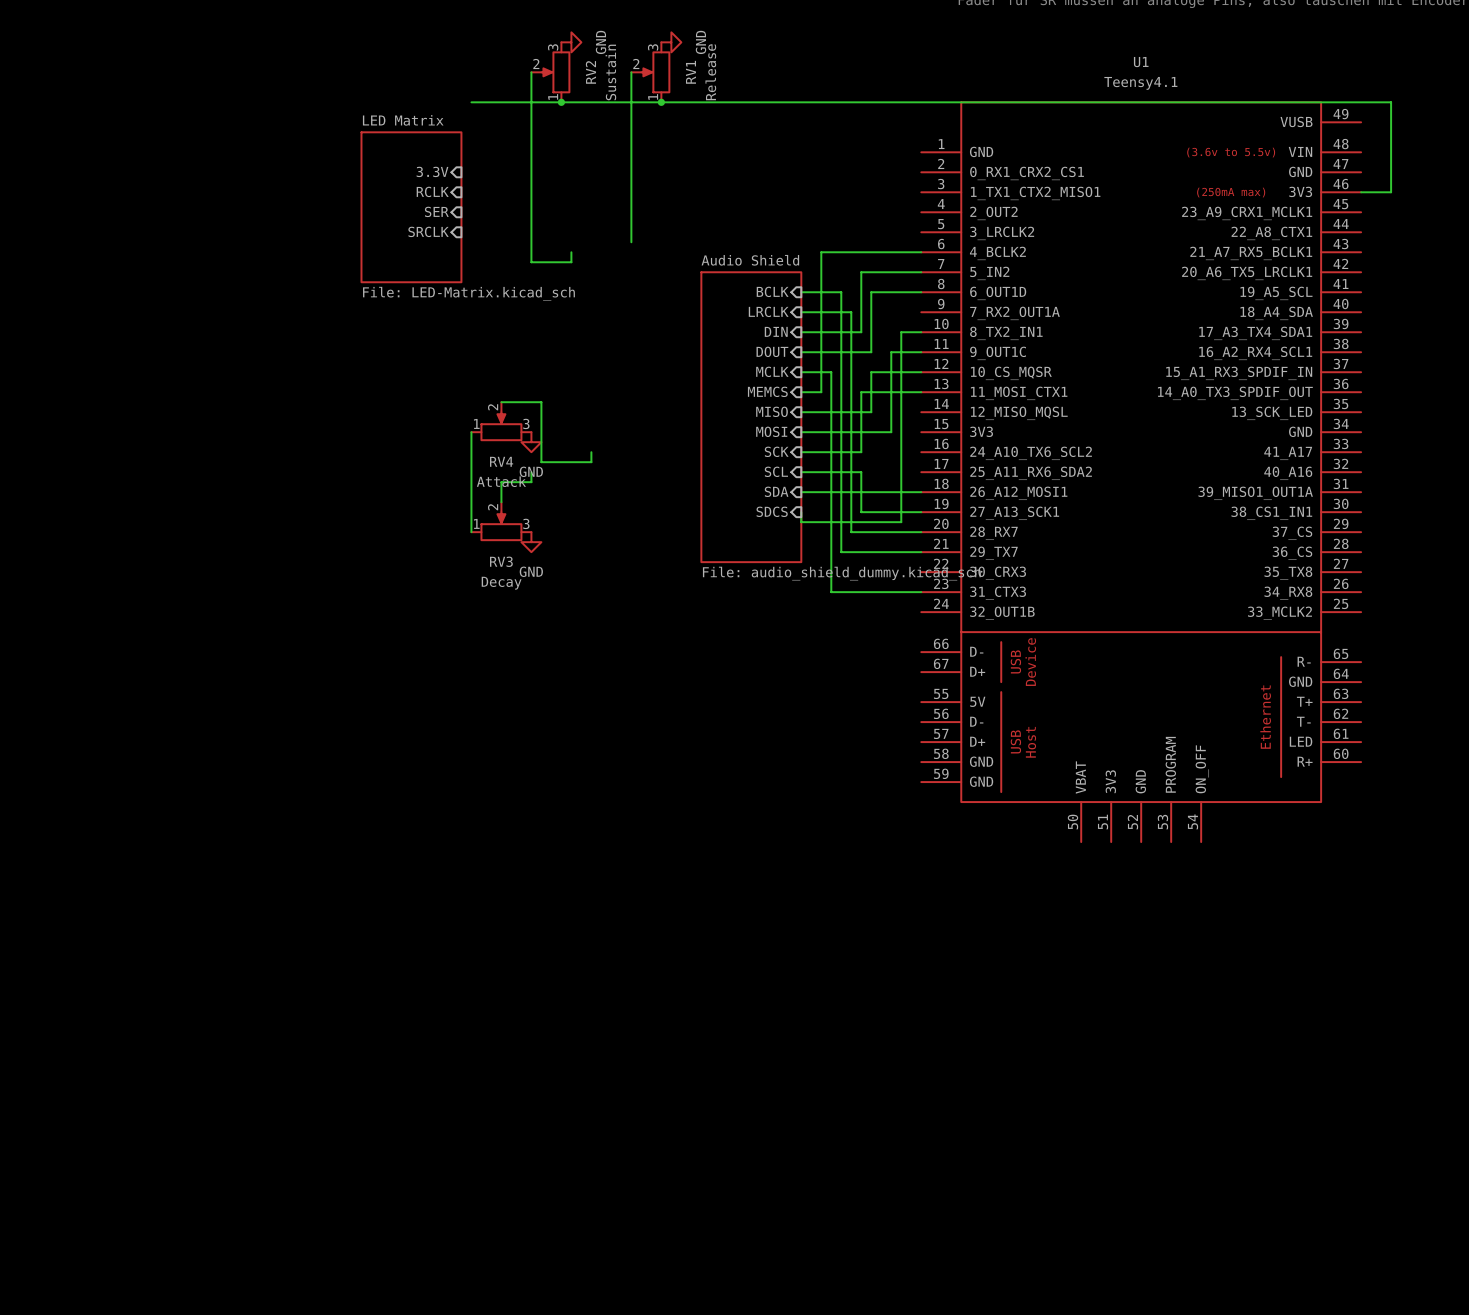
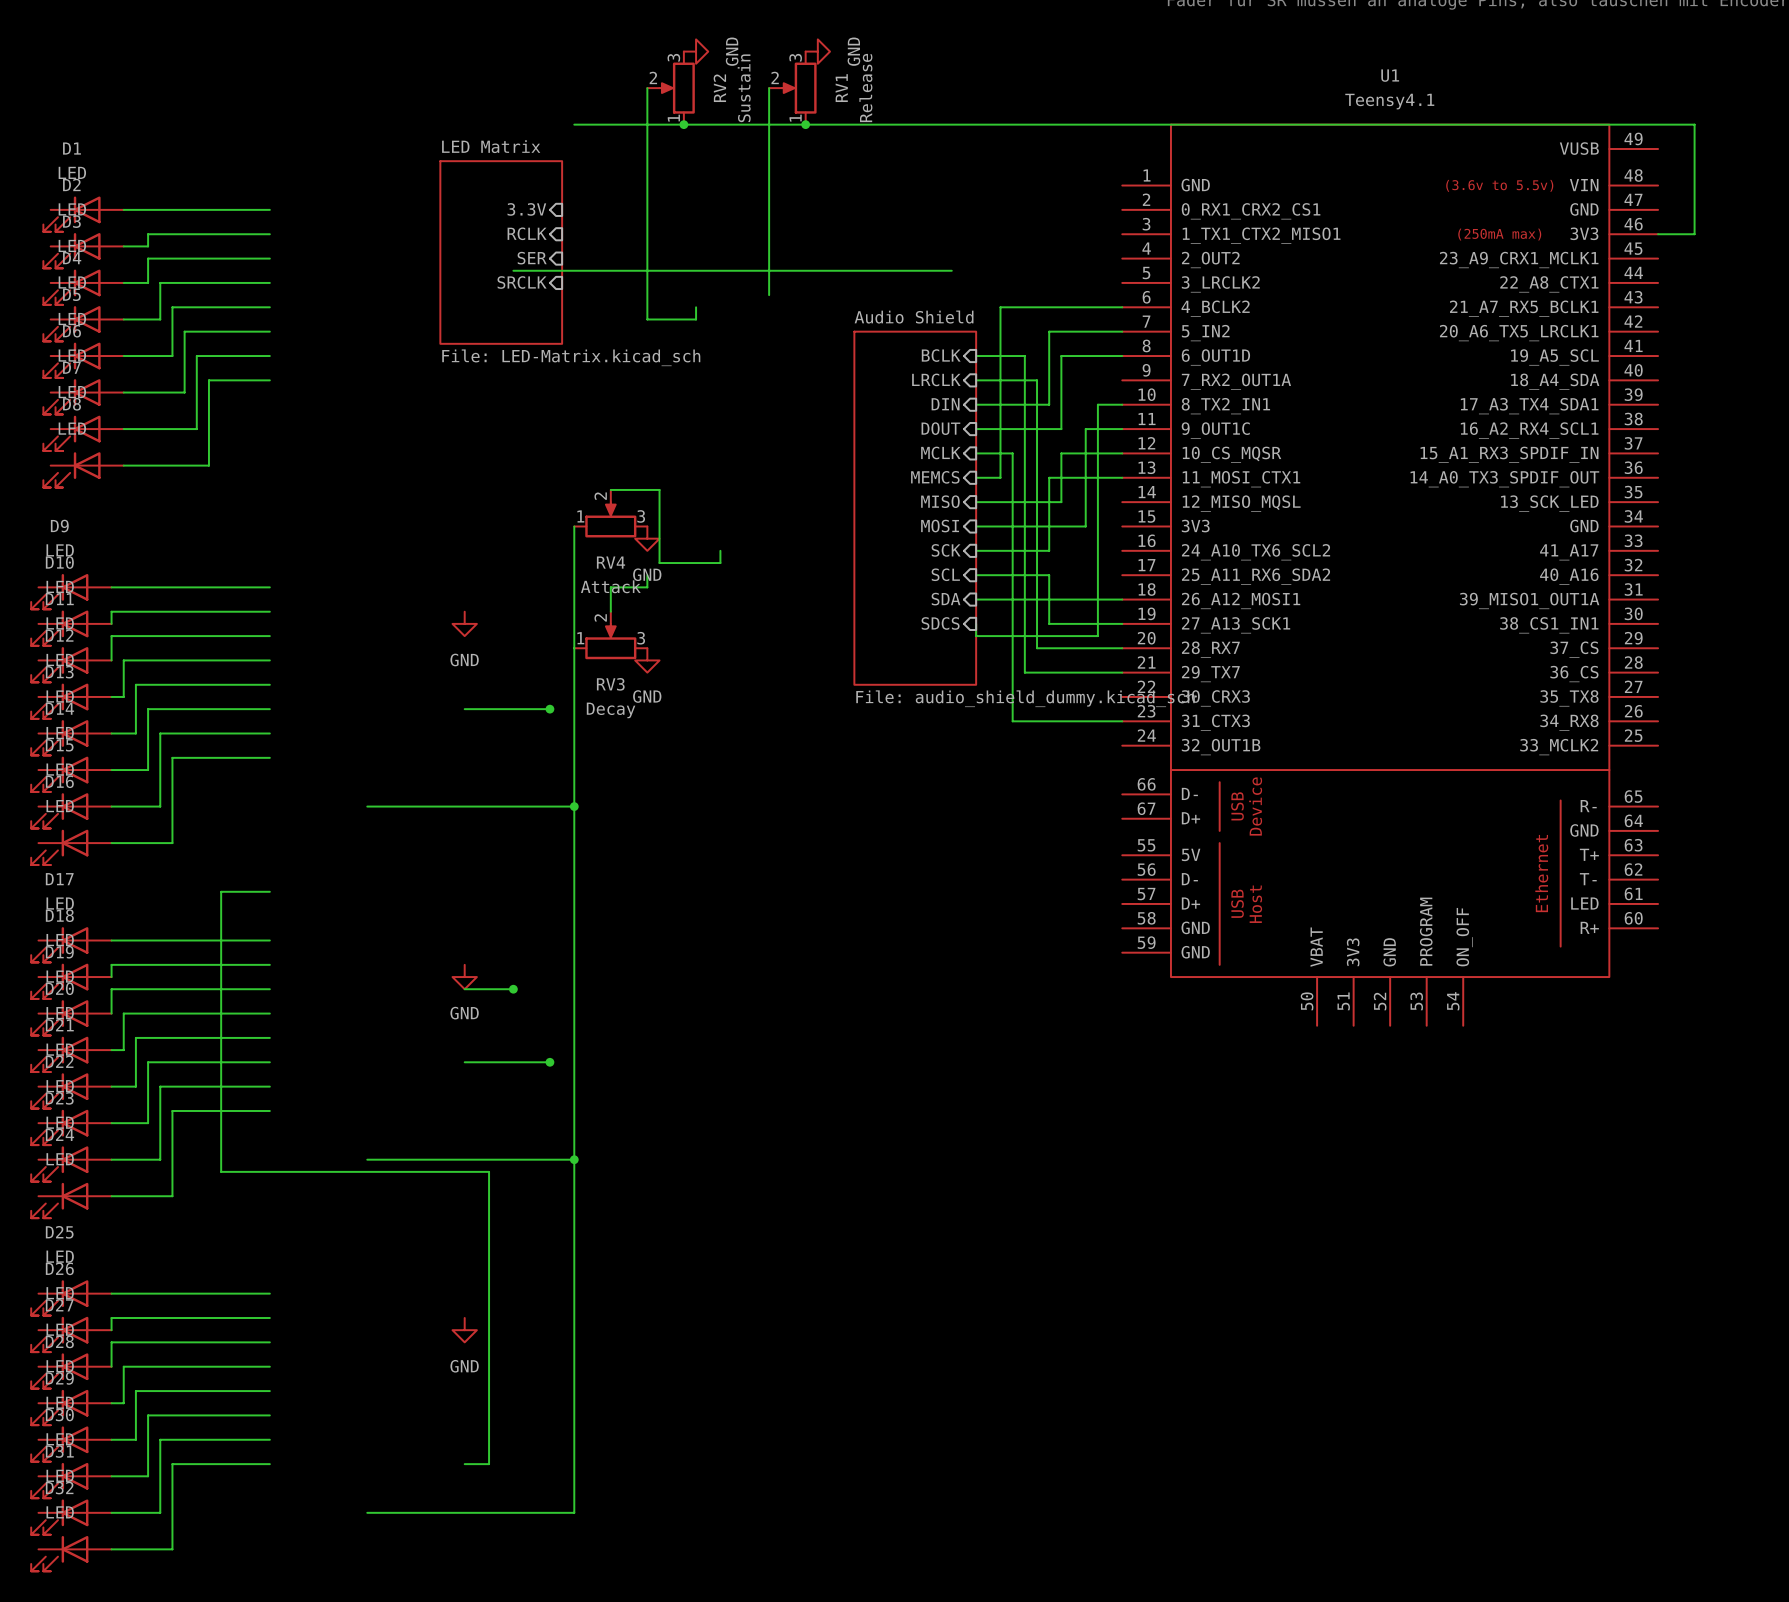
wire: none -> (123, 209) (269, 209)
D1: none -> LED (83, 214)
wire: none -> (269, 234) (148, 234) (148, 246) (123, 246)
D2: none -> LED (83, 250)
wire: none -> (269, 258) (148, 258) (148, 282) (123, 282)
wire: none -> (513, 270) (951, 270)
wire: none -> (269, 282) (160, 282) (160, 319) (123, 319)
D3: none -> LED (83, 287)
wire: none -> (269, 307) (172, 307) (172, 356) (123, 356)
D4: none -> LED (83, 323)
wire: none -> (269, 331) (184, 331) (184, 392) (123, 392)
wire: none -> (269, 356) (196, 356) (196, 429) (123, 429)
D5: none -> LED (83, 360)
wire: none -> (269, 380) (208, 380) (208, 465) (123, 465)
D6: none -> LED (83, 396)
D7: none -> LED (83, 433)
D8: none -> LED (83, 469)
wire: none -> (111, 587) (269, 587)
D9: none -> LED (71, 591)
wire: none -> (269, 611) (111, 611) (111, 623)
power symbol: none -> GND (464, 623)
D10: none -> LED (71, 628)
wire: none -> (269, 636) (111, 636) (111, 660)
wire: none -> (574, 648) (574, 1512) (367, 1512)
wire: none -> (269, 660) (123, 660) (123, 696) (111, 696)
D11: none -> LED (71, 664)
wire: none -> (269, 684) (135, 684) (135, 733) (111, 733)
D12: none -> LED (71, 701)
wire: none -> (269, 709) (148, 709) (148, 770) (111, 770)
wire: none -> (464, 709) (549, 709)
junction: none -> (549, 709)
wire: none -> (269, 733) (160, 733) (160, 806) (111, 806)
D13: none -> LED (71, 737)
wire: none -> (269, 757) (172, 757) (172, 843) (111, 843)
D14: none -> LED (71, 774)
wire: none -> (367, 806) (574, 806)
junction: none -> (574, 806)
D15: none -> LED (71, 810)
D16: none -> LED (71, 847)
wire: none -> (269, 891) (221, 891) (221, 1171) (489, 1171) (489, 1464) (464, 1464)
wire: none -> (111, 940) (269, 940)
D17: none -> LED (71, 944)
wire: none -> (269, 964) (111, 964) (111, 977)
power symbol: none -> GND (464, 977)
D18: none -> LED (71, 981)
wire: none -> (269, 989) (111, 989) (111, 1013)
wire: none -> (464, 989) (513, 989)
junction: none -> (513, 989)
wire: none -> (269, 1013) (123, 1013) (123, 1050) (111, 1050)
D19: none -> LED (71, 1017)
wire: none -> (269, 1037) (135, 1037) (135, 1086) (111, 1086)
D20: none -> LED (71, 1054)
wire: none -> (269, 1062) (148, 1062) (148, 1123) (111, 1123)
wire: none -> (464, 1062) (549, 1062)
junction: none -> (549, 1062)
wire: none -> (269, 1086) (160, 1086) (160, 1159) (111, 1159)
D21: none -> LED (71, 1090)
wire: none -> (269, 1110) (172, 1110) (172, 1196) (111, 1196)
D22: none -> LED (71, 1127)
wire: none -> (367, 1159) (574, 1159)
junction: none -> (574, 1159)
D23: none -> LED (71, 1163)
D24: none -> LED (71, 1200)
wire: none -> (111, 1293) (269, 1293)
D25: none -> LED (71, 1297)
wire: none -> (269, 1318) (111, 1318) (111, 1330)
power symbol: none -> GND (464, 1330)
D26: none -> LED (71, 1334)
wire: none -> (269, 1342) (111, 1342) (111, 1366)
wire: none -> (269, 1366) (123, 1366) (123, 1403) (111, 1403)
D27: none -> LED (71, 1370)
wire: none -> (269, 1391) (135, 1391) (135, 1439) (111, 1439)
D28: none -> LED (71, 1407)
wire: none -> (269, 1415) (148, 1415) (148, 1476) (111, 1476)
wire: none -> (269, 1439) (160, 1439) (160, 1512) (111, 1512)
D29: none -> LED (71, 1444)
wire: none -> (269, 1464) (172, 1464) (172, 1549) (111, 1549)
D30: none -> LED (71, 1480)
D31: none -> LED (71, 1517)
D32: none -> LED (71, 1553)

